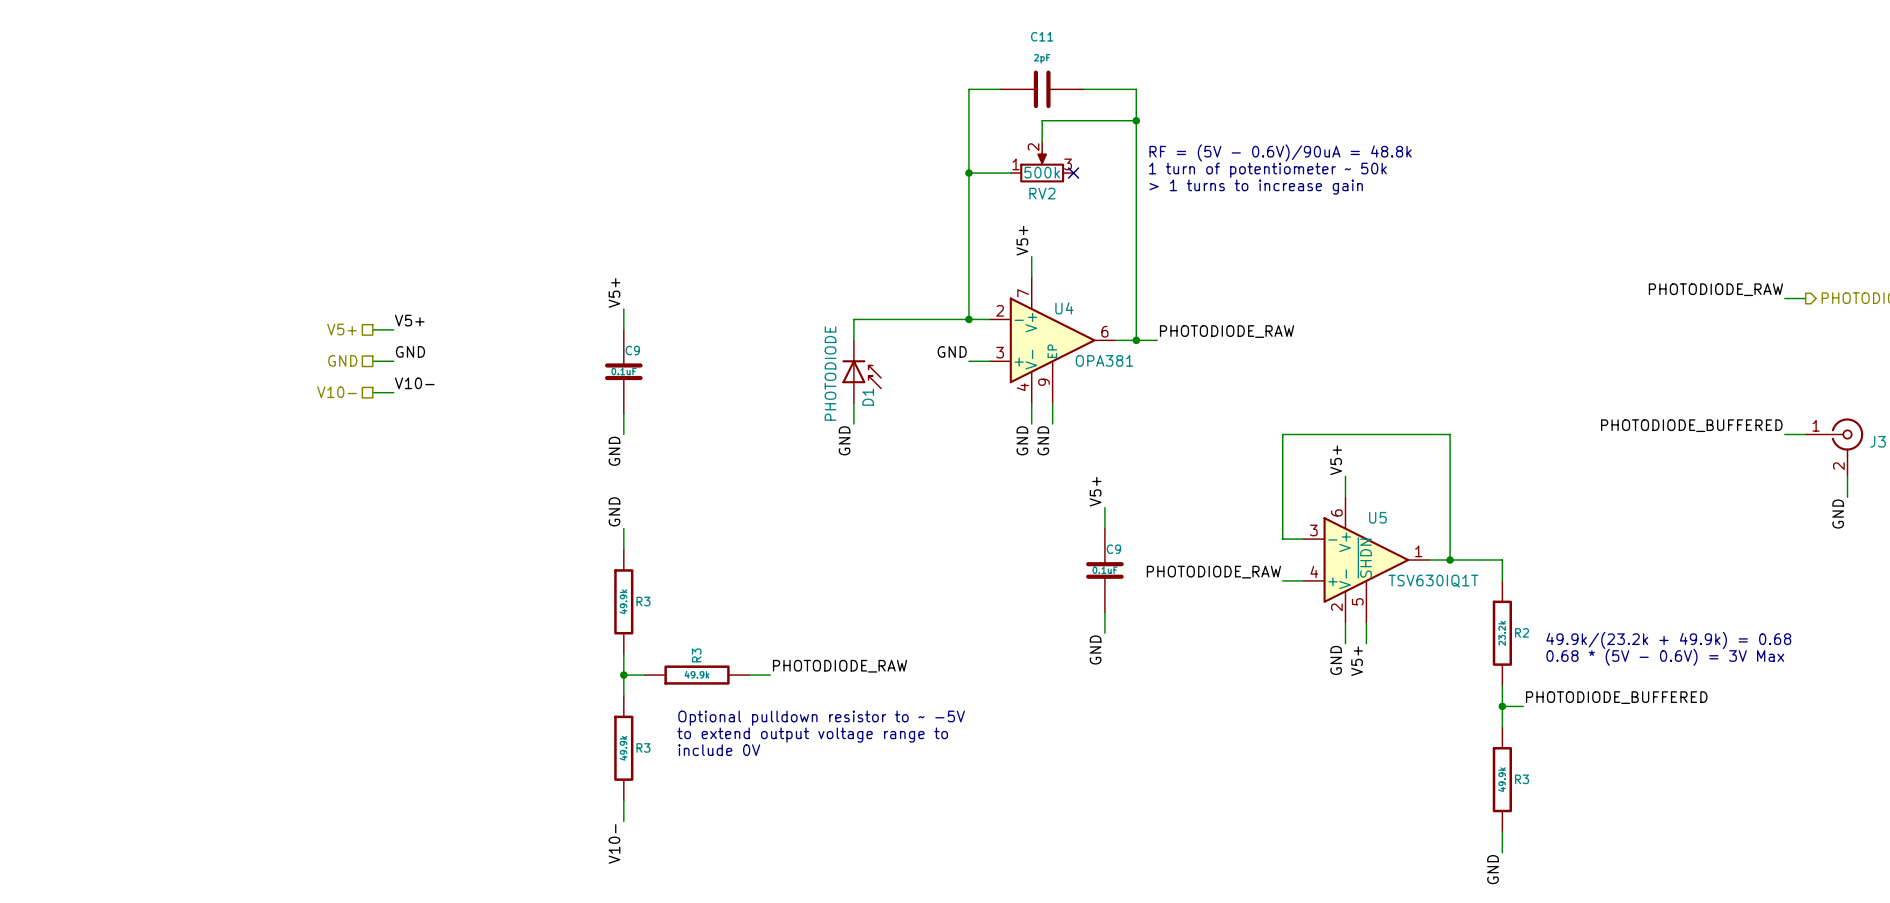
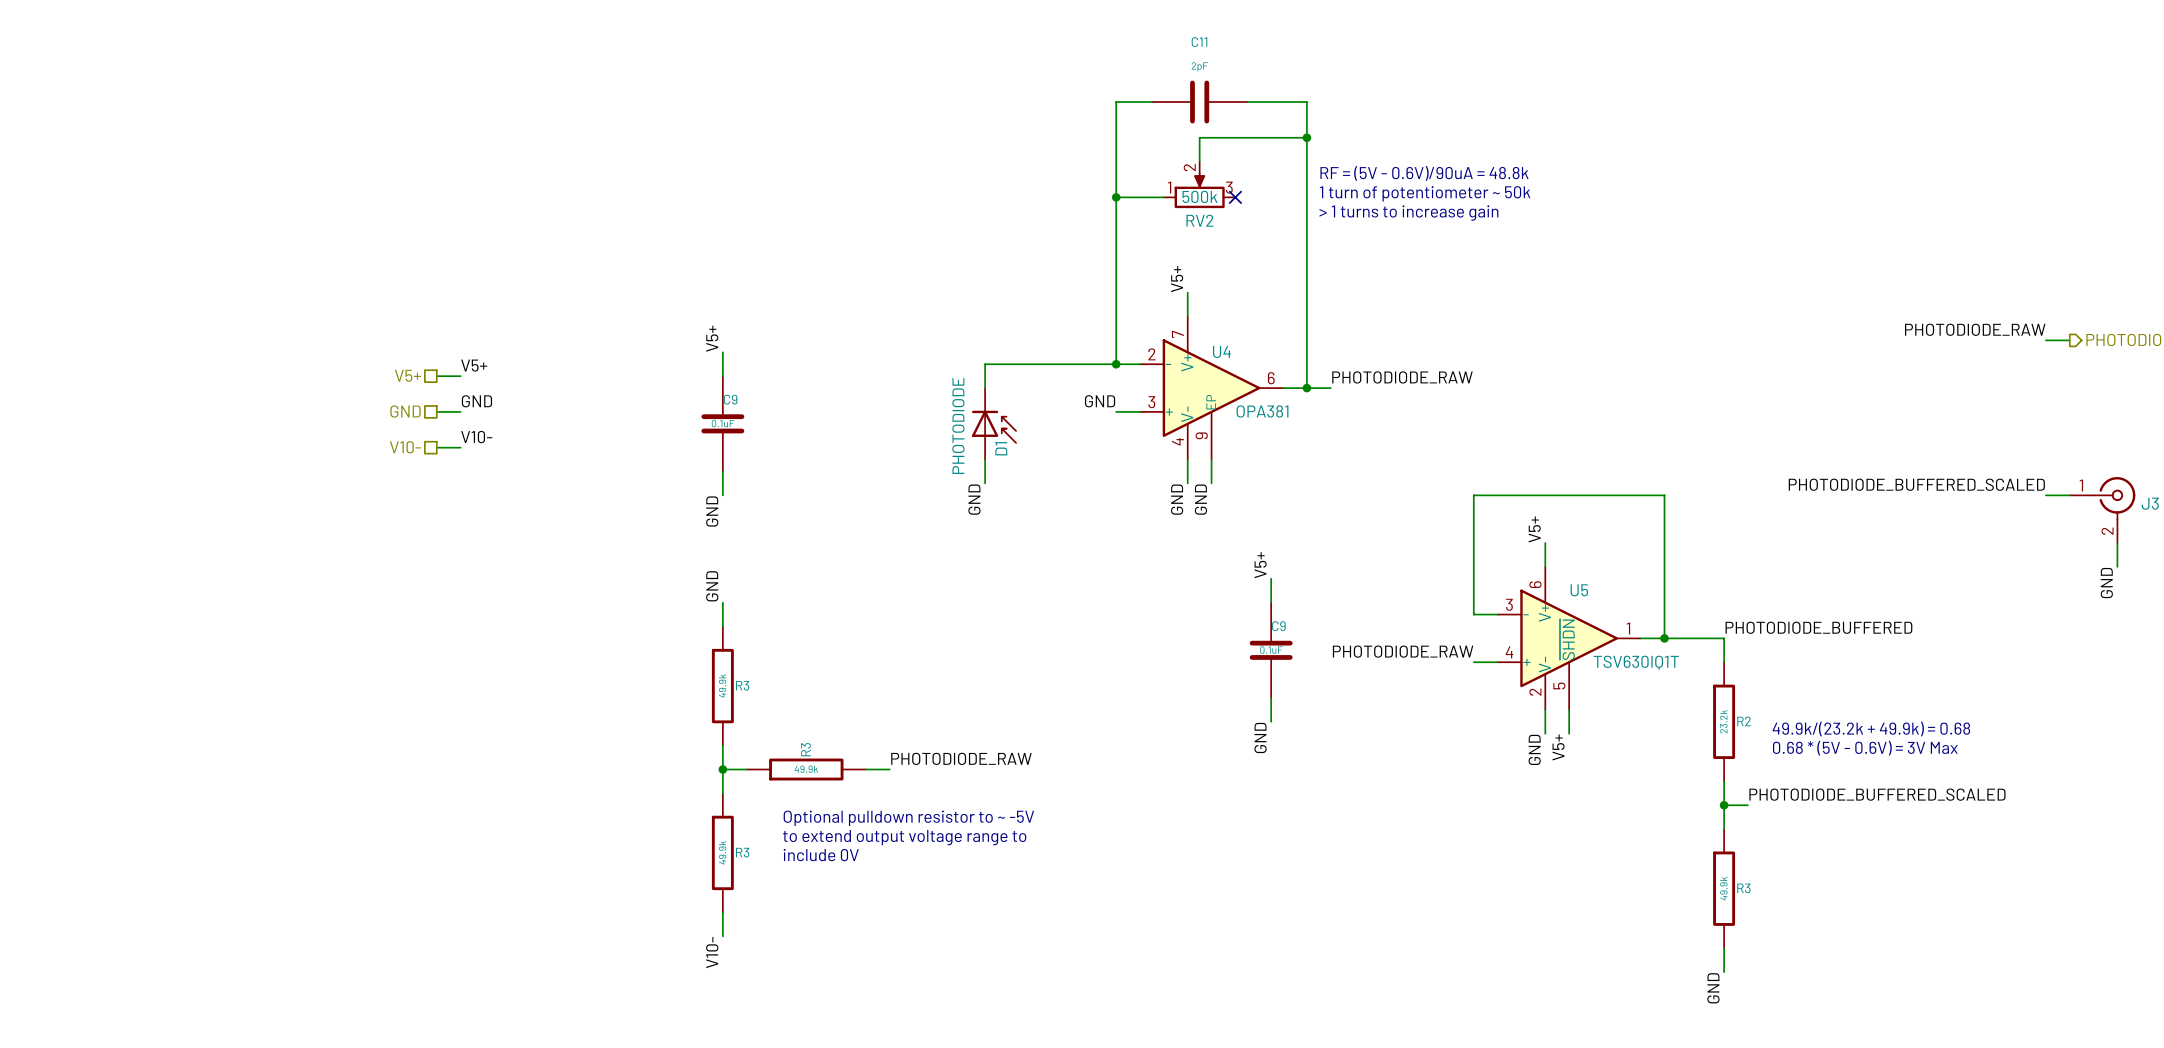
label: PHOTODIODE_BUFFERED (1691, 425) -> PHOTODIODE_BUFFERED_SCALED (1916, 484)
label: none -> PHOTODIODE_BUFFERED (1818, 627)
label: PHOTODIODE_BUFFERED (1616, 697) -> PHOTODIODE_BUFFERED_SCALED (1877, 794)

